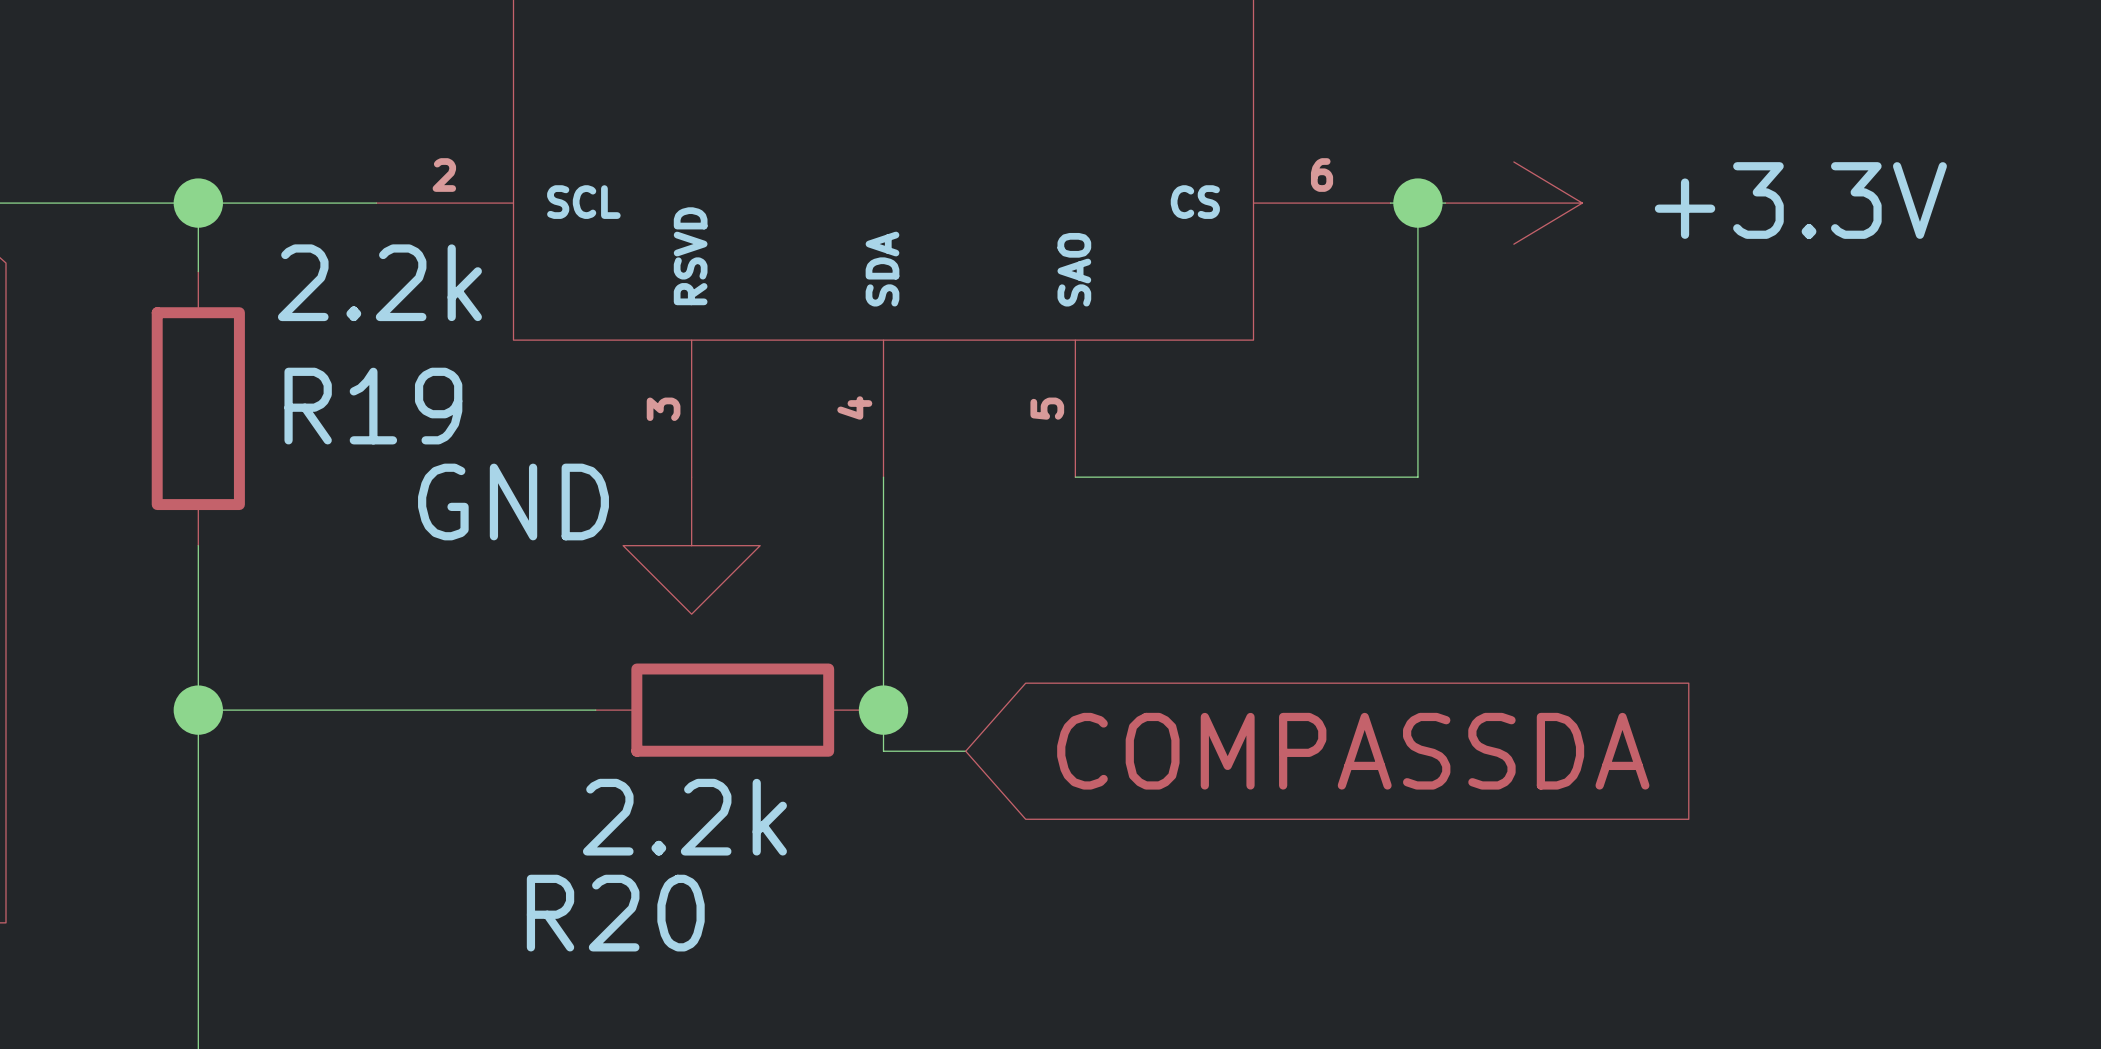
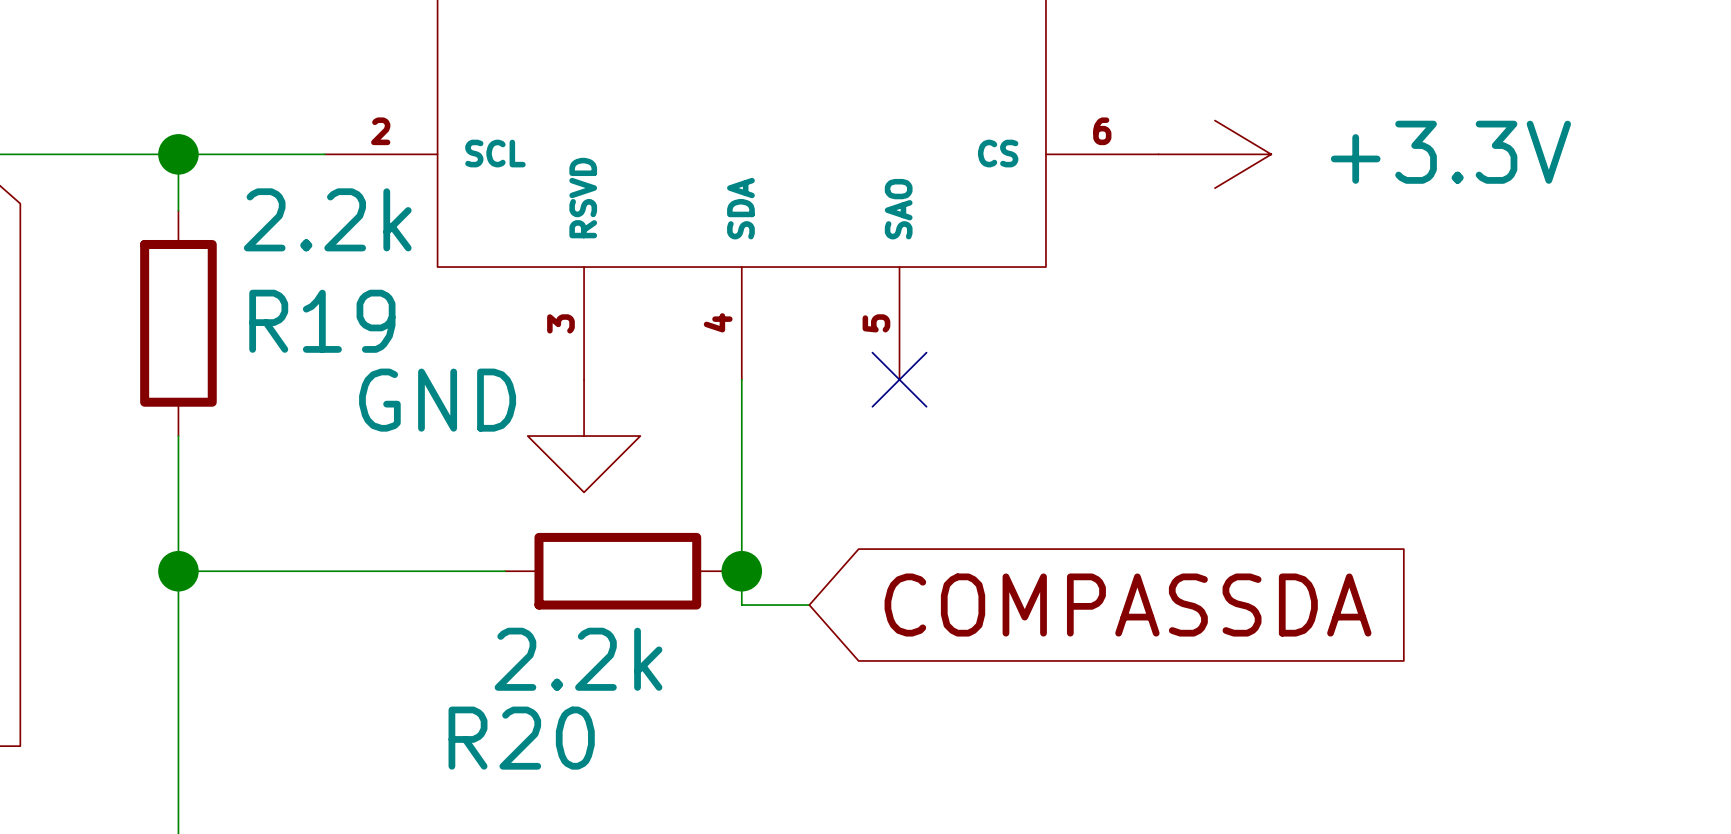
wire: (1417, 203) (1417, 477) (1075, 477) -> none
junction: (1417, 203) -> none
power symbol position: +3.3V (1513, 203) -> +3.3V (1214, 154)
no-connect mark: none -> (899, 379)

